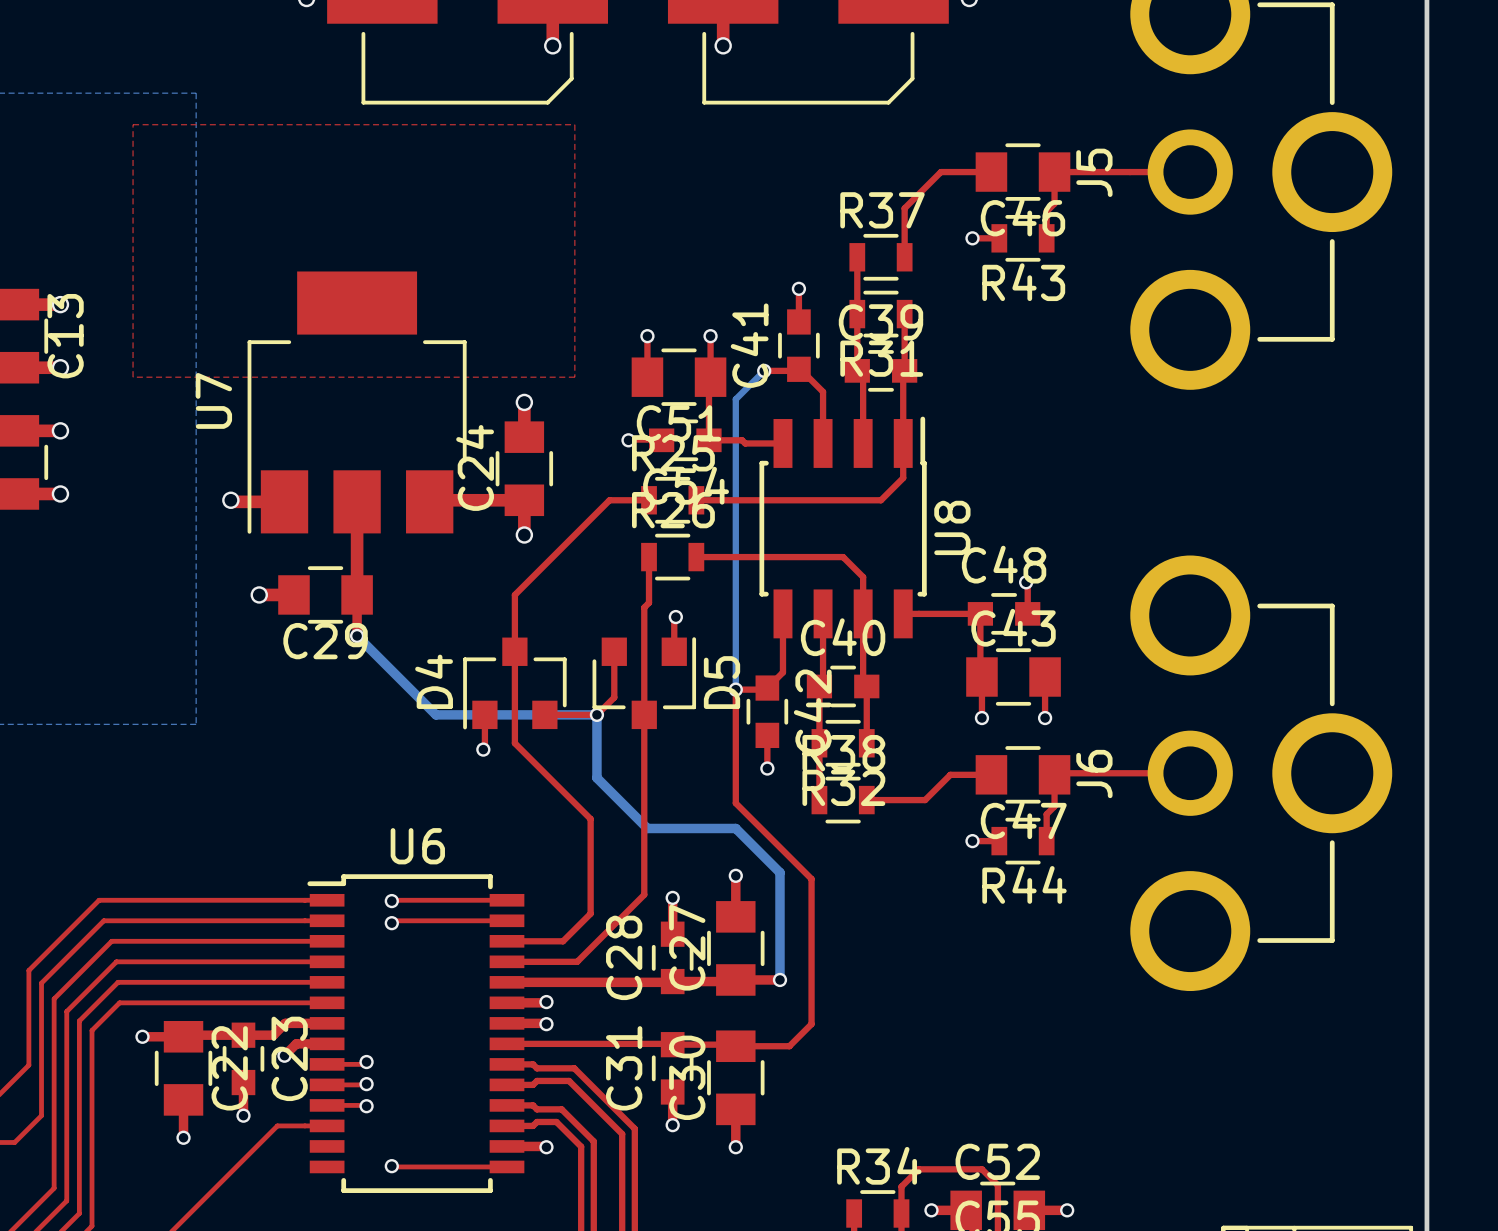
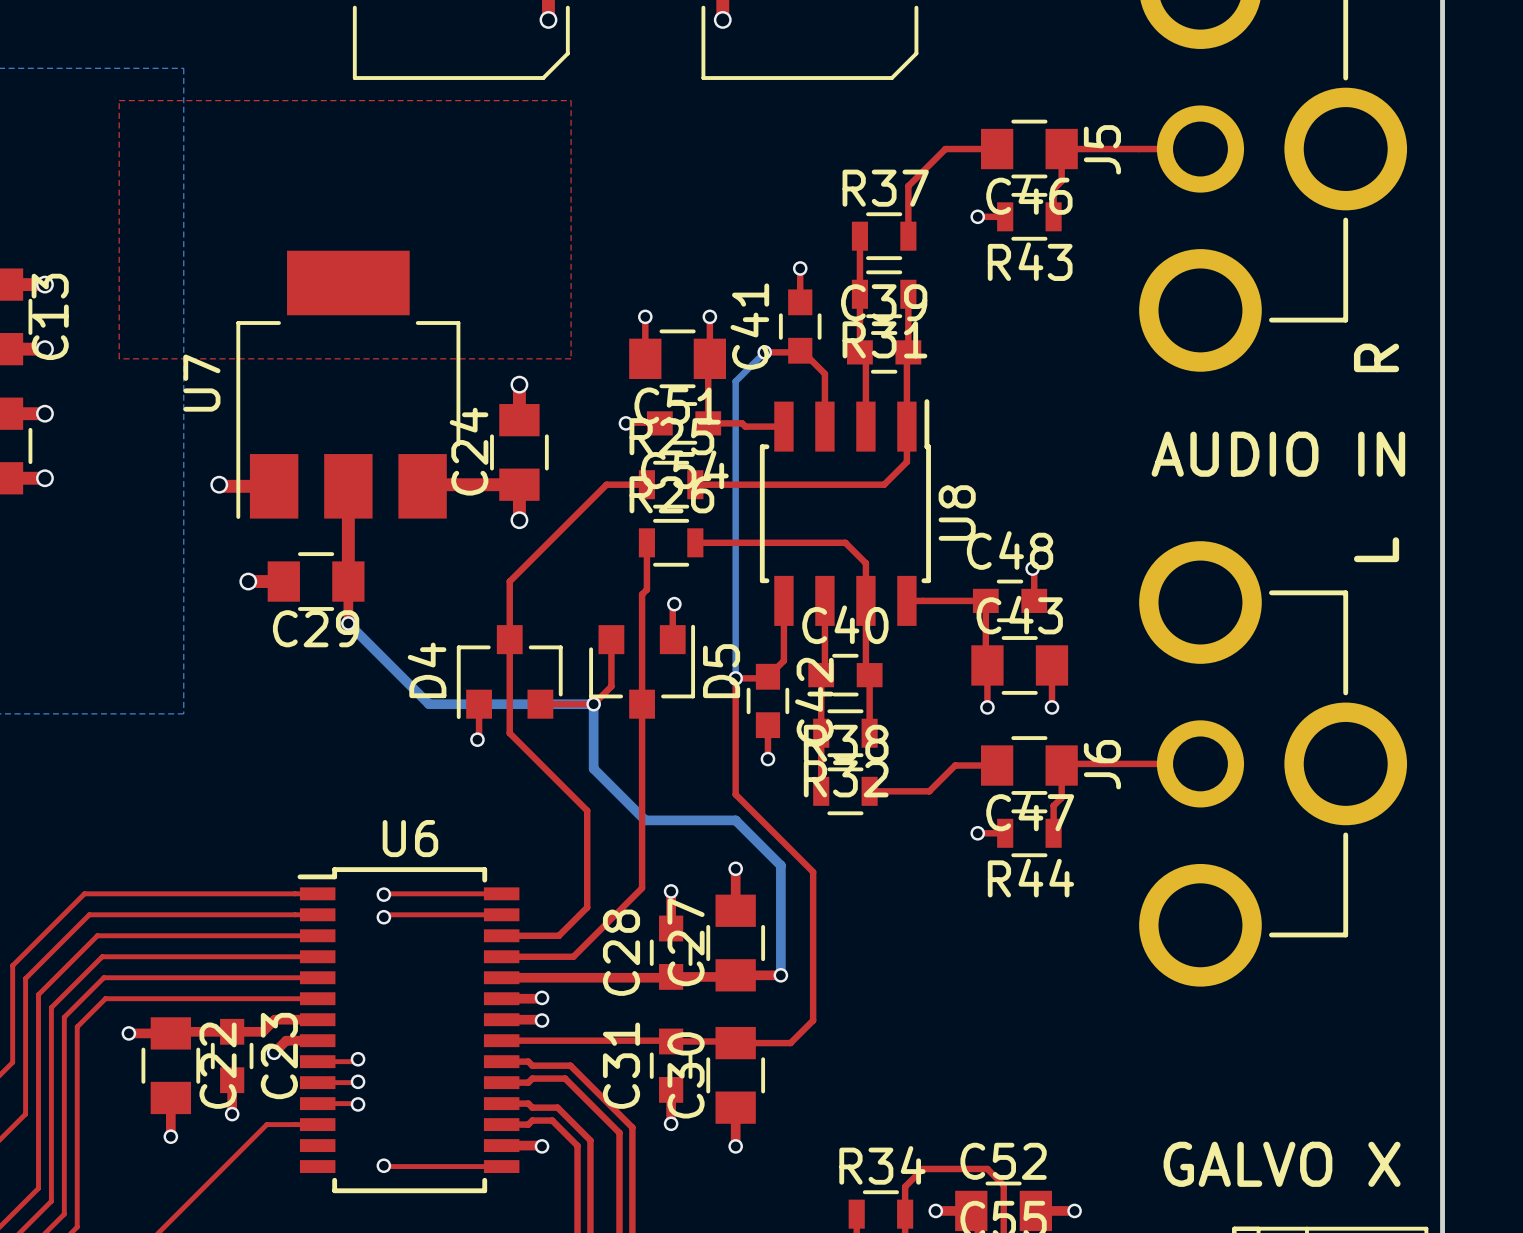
text: none -> R (1376, 357)
text: none -> AUDIO IN (1278, 454)
text: none -> L (1376, 549)
text: none -> GALVO X (1282, 1164)

